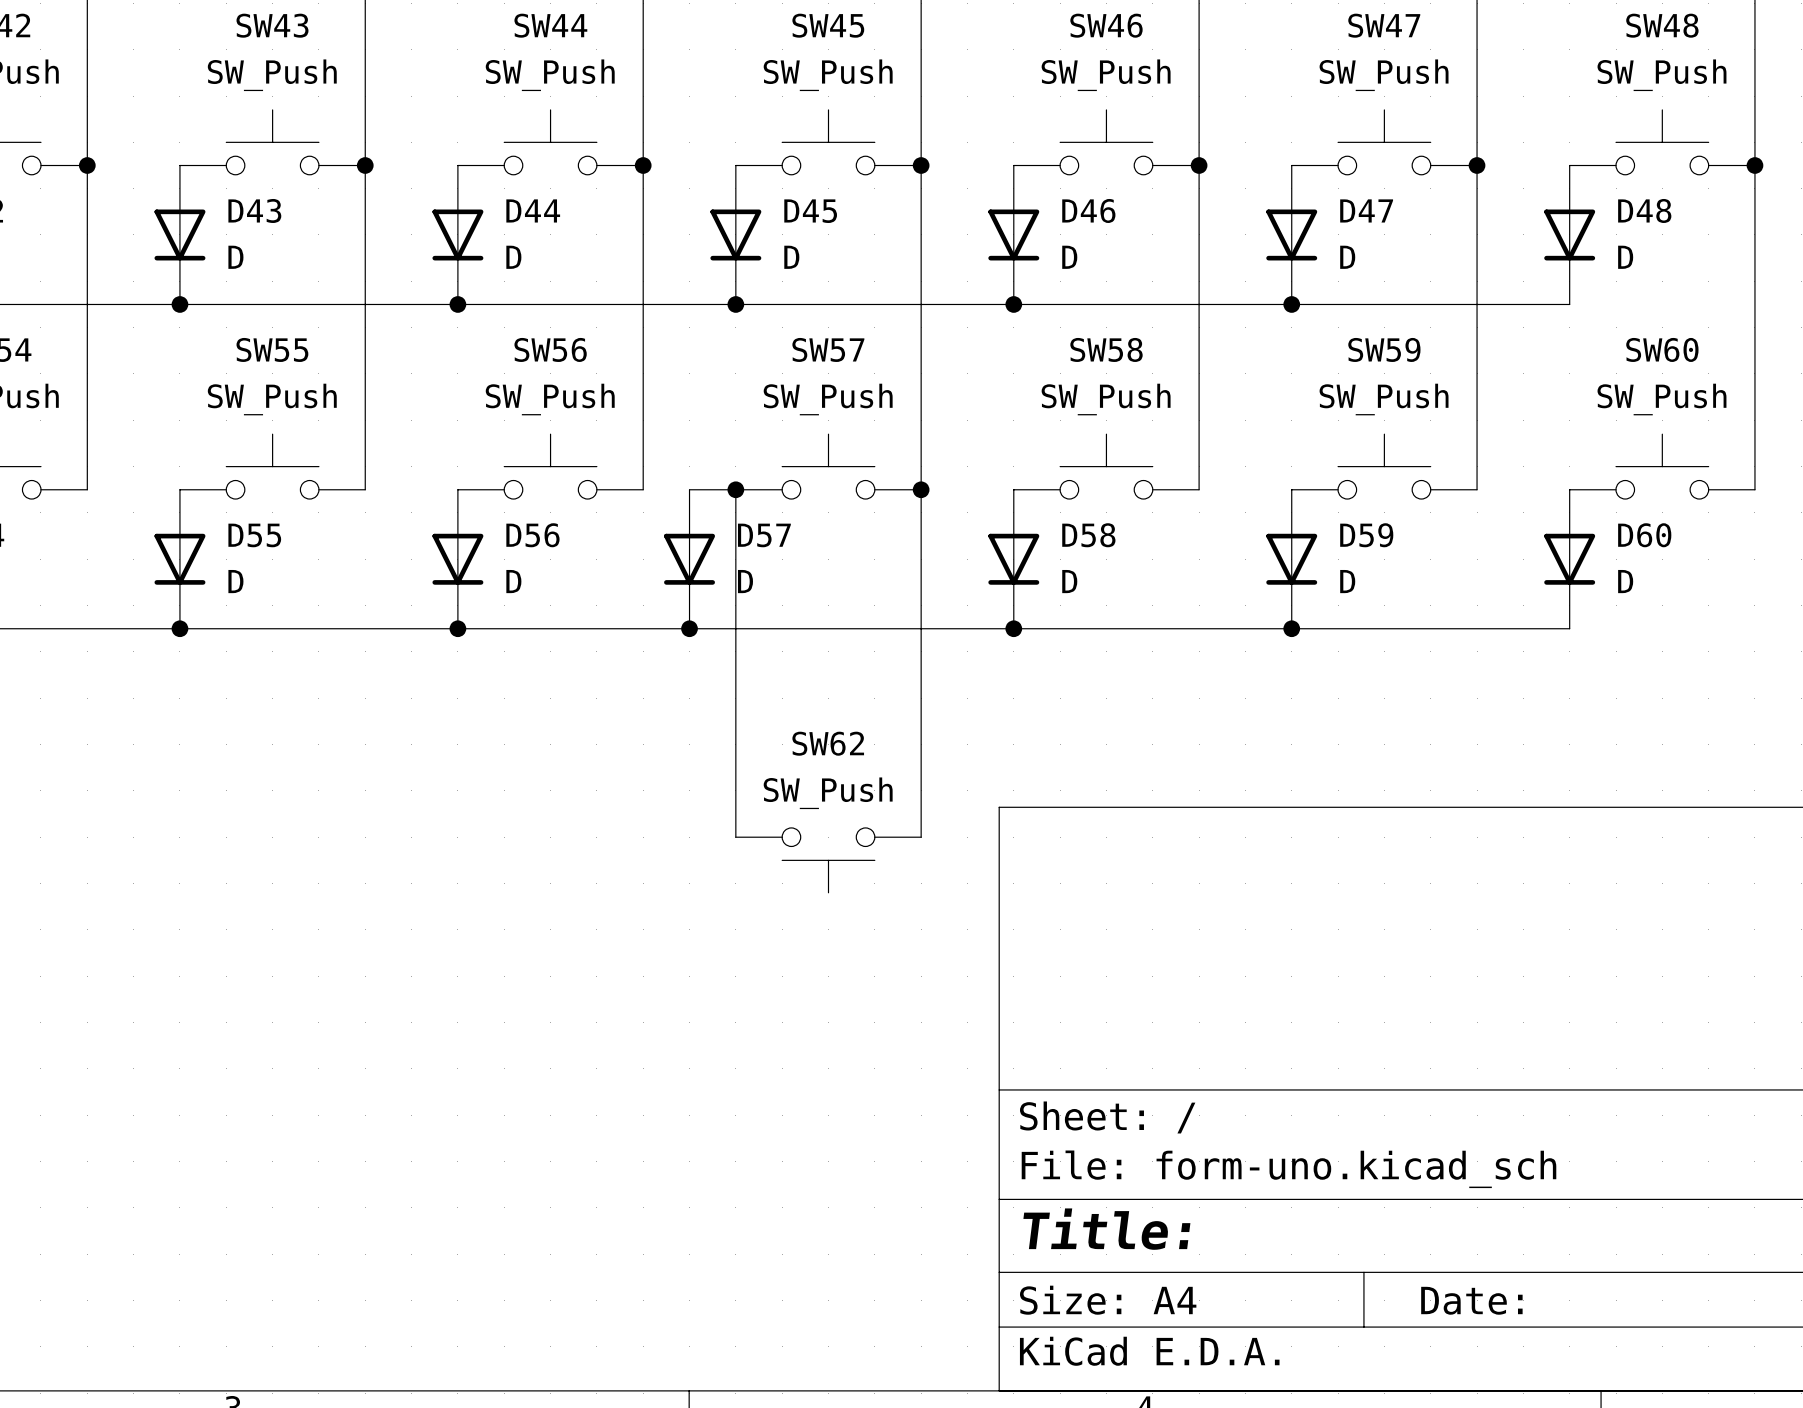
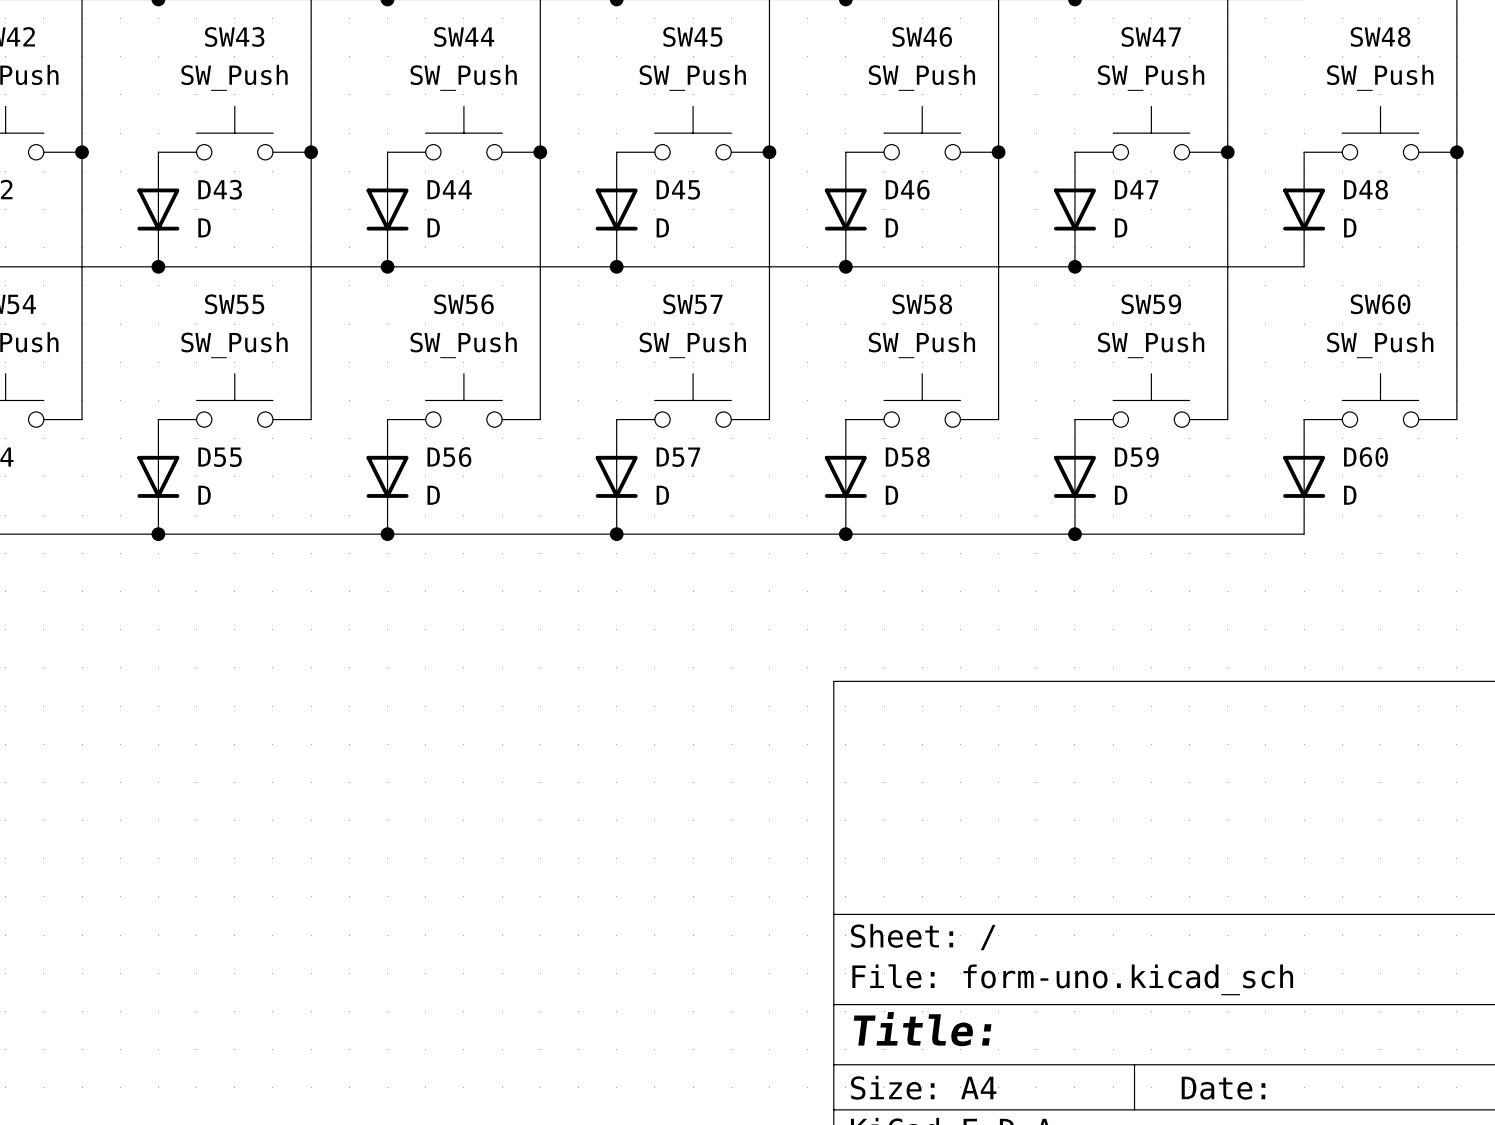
wire: (689, 489) (735, 489) (735, 837) -> none
junction: (735, 489) -> none
wire: (921, 489) (921, 837) -> none
junction: (921, 489) -> none
D57 position: (689, 559) -> (616, 476)
junction position: (689, 628) -> (616, 534)
SW62: SW_Push (828, 860) -> none

